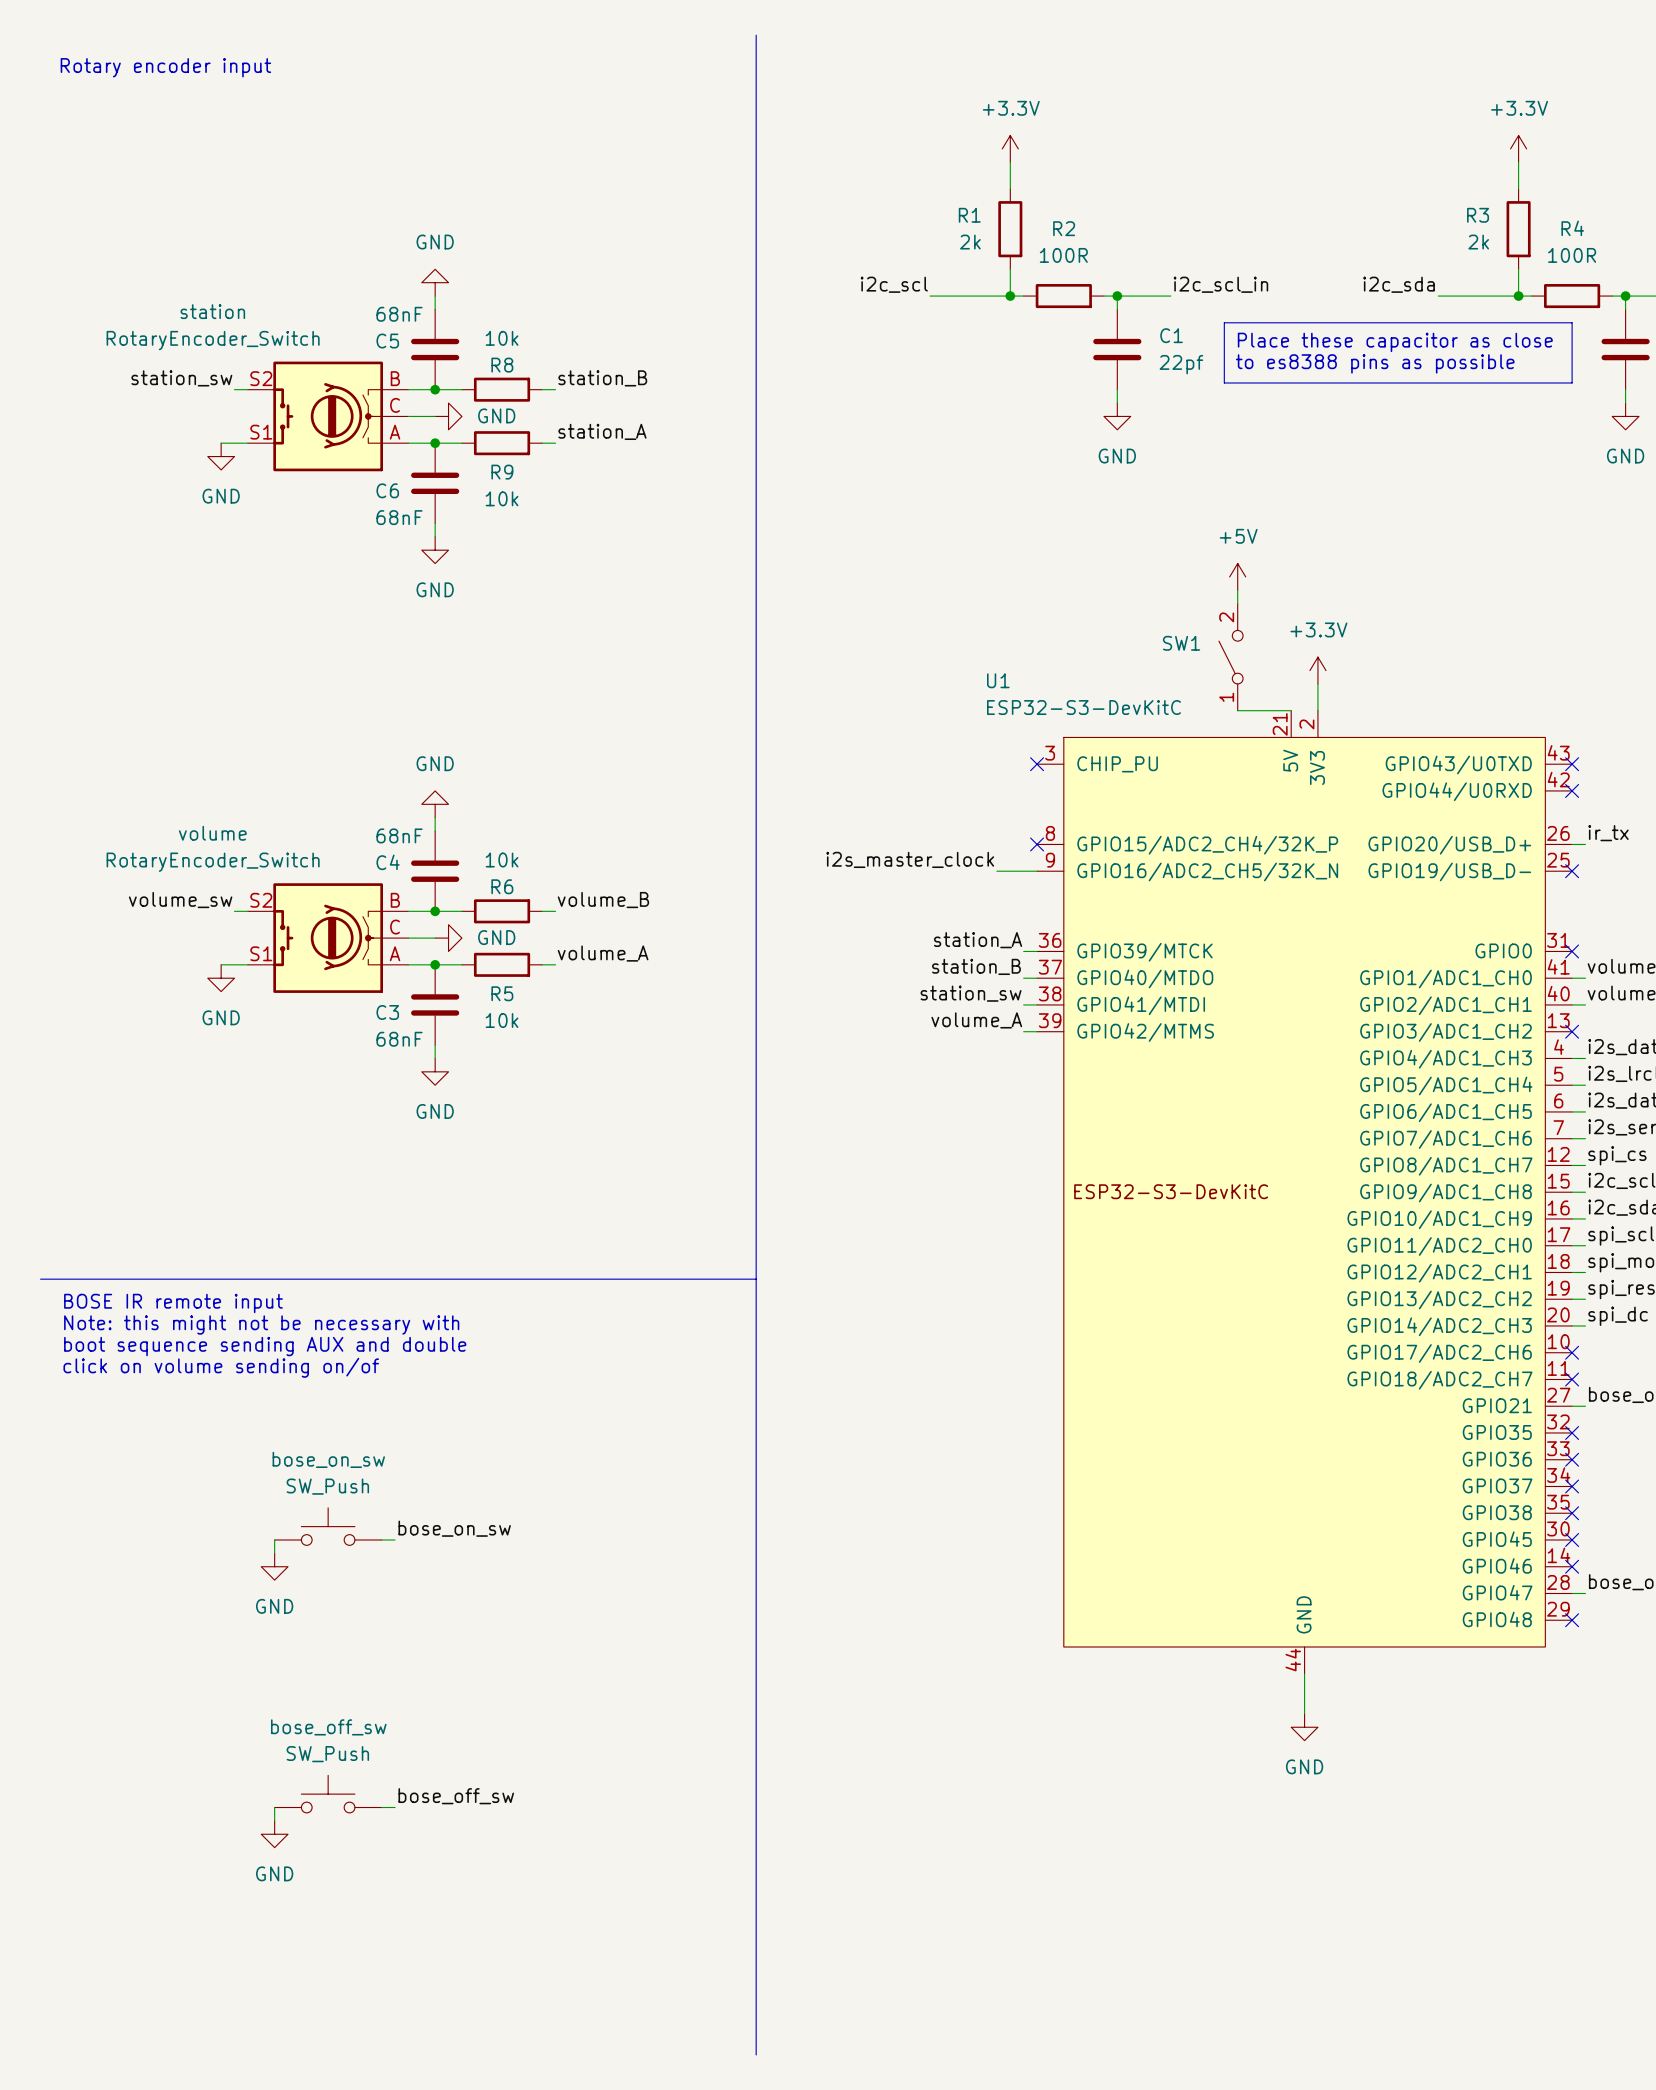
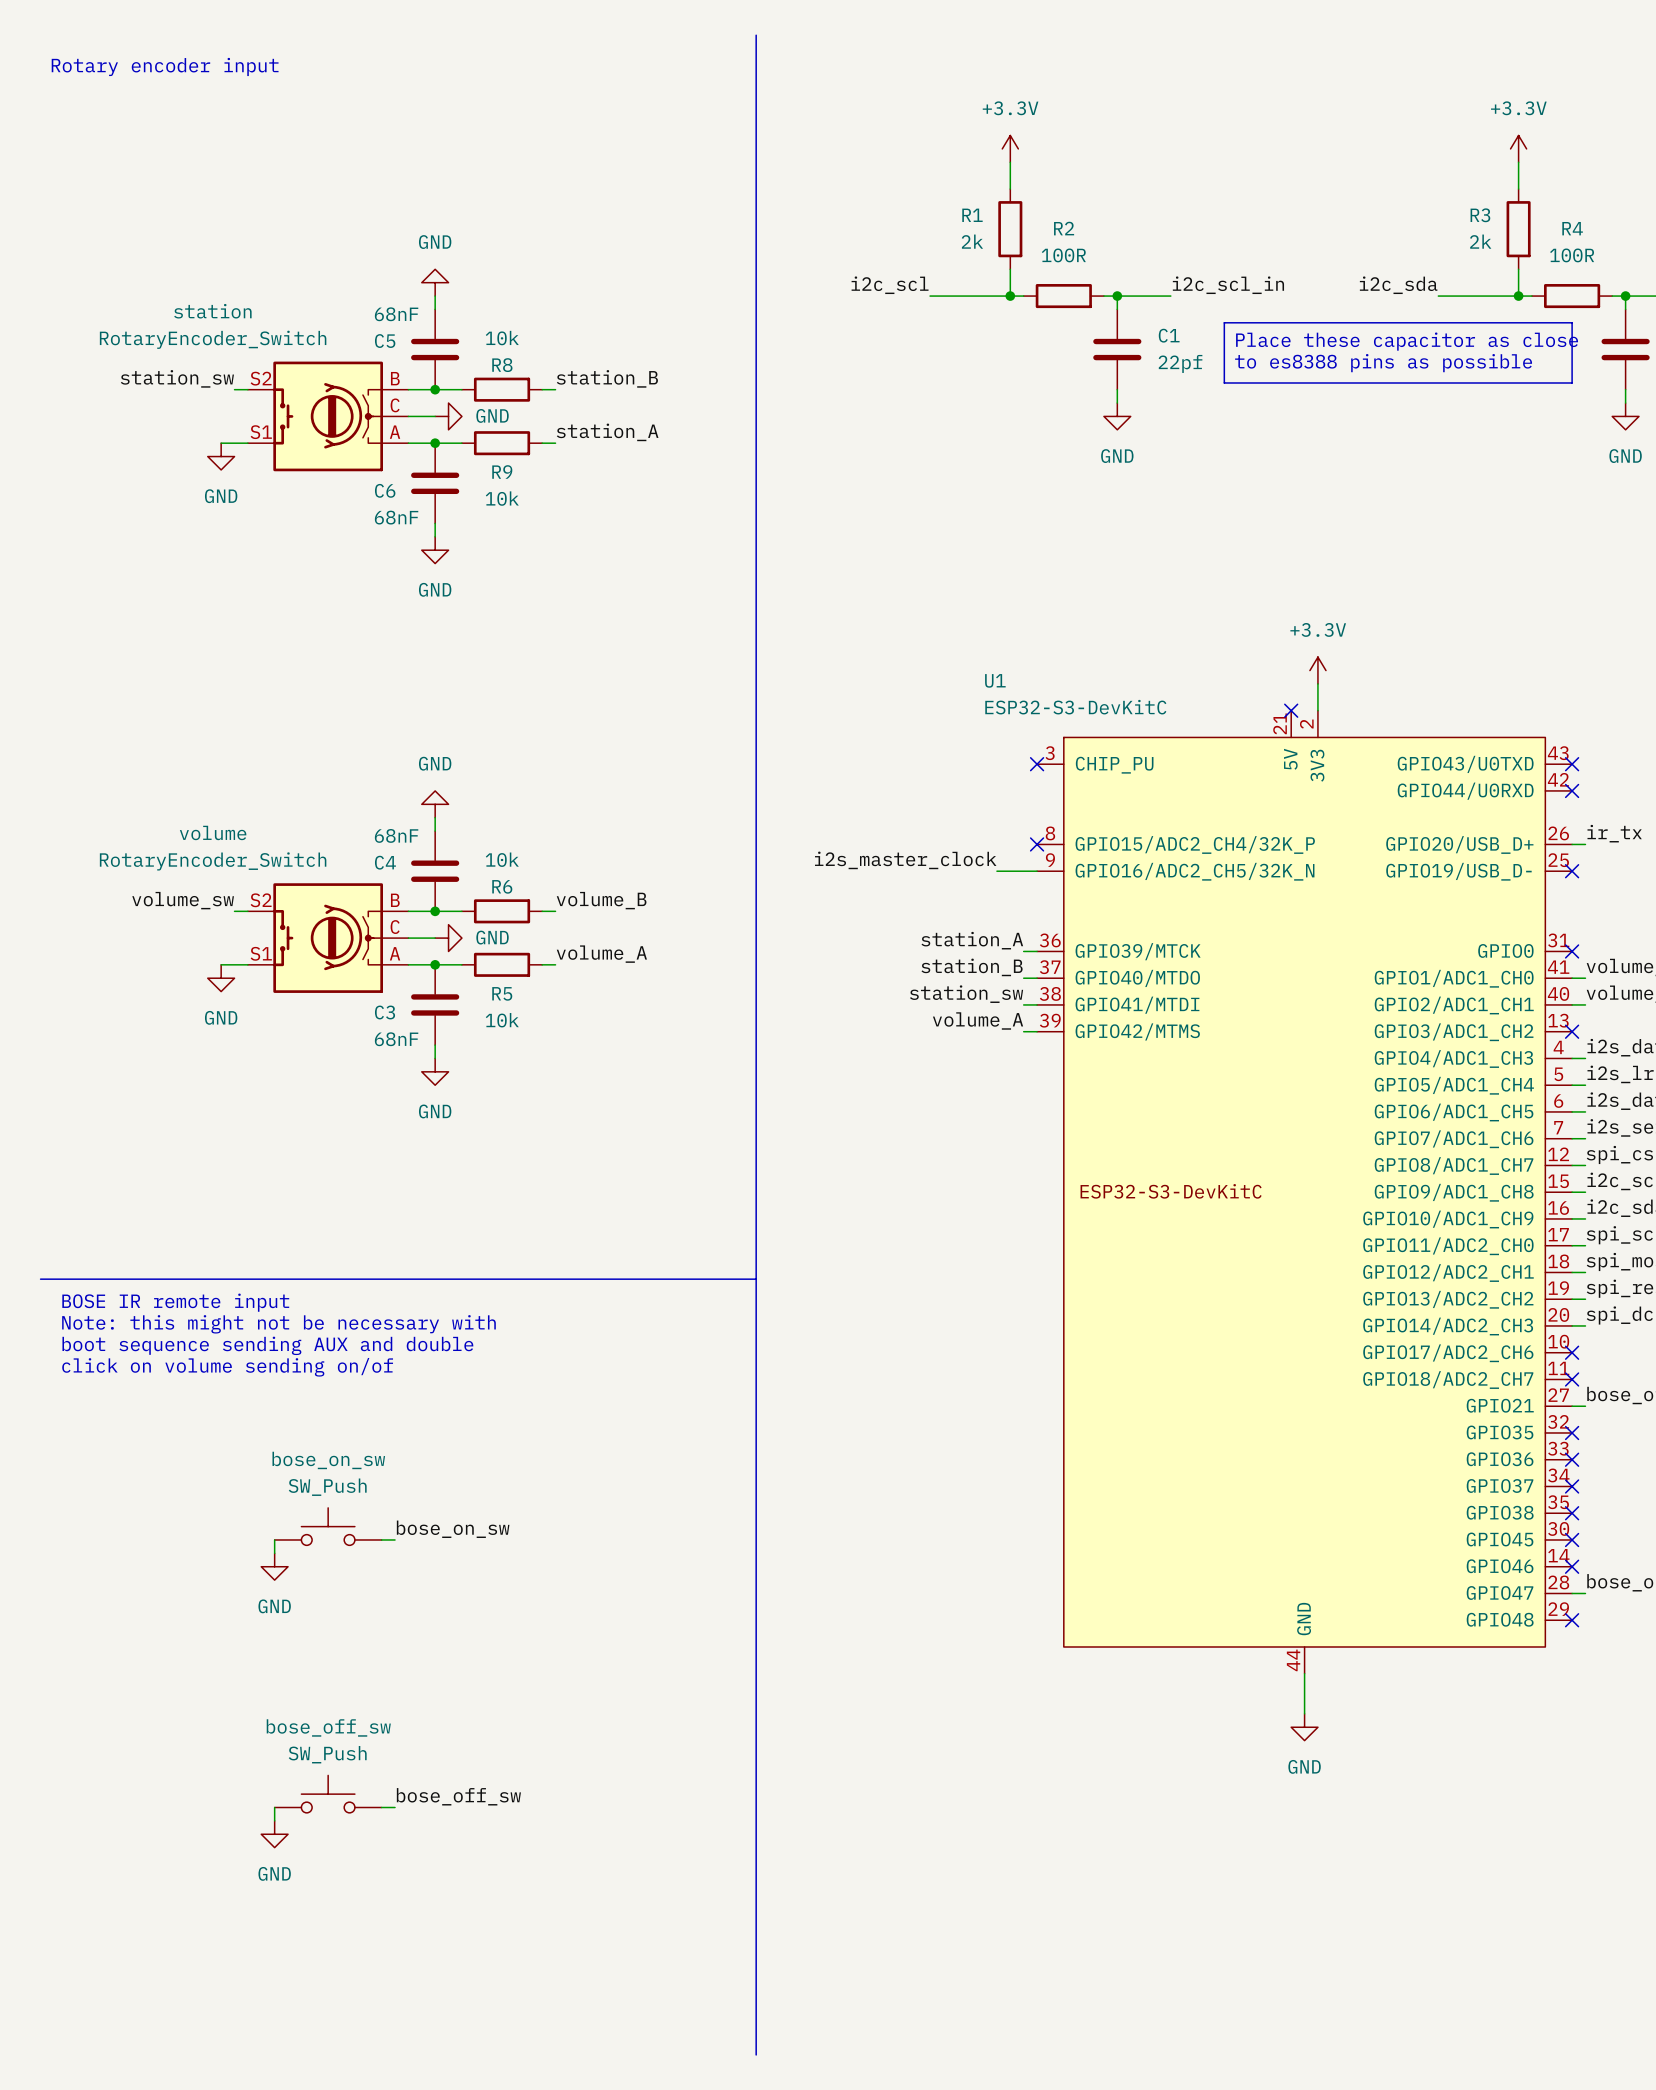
power symbol: +5V (1237, 576) -> none
wire: (1237, 590) (1237, 603) -> none
SW1: (1231, 657) -> none
wire: (1237, 710) (1291, 710) -> none
no-connect mark: none -> (1291, 710)

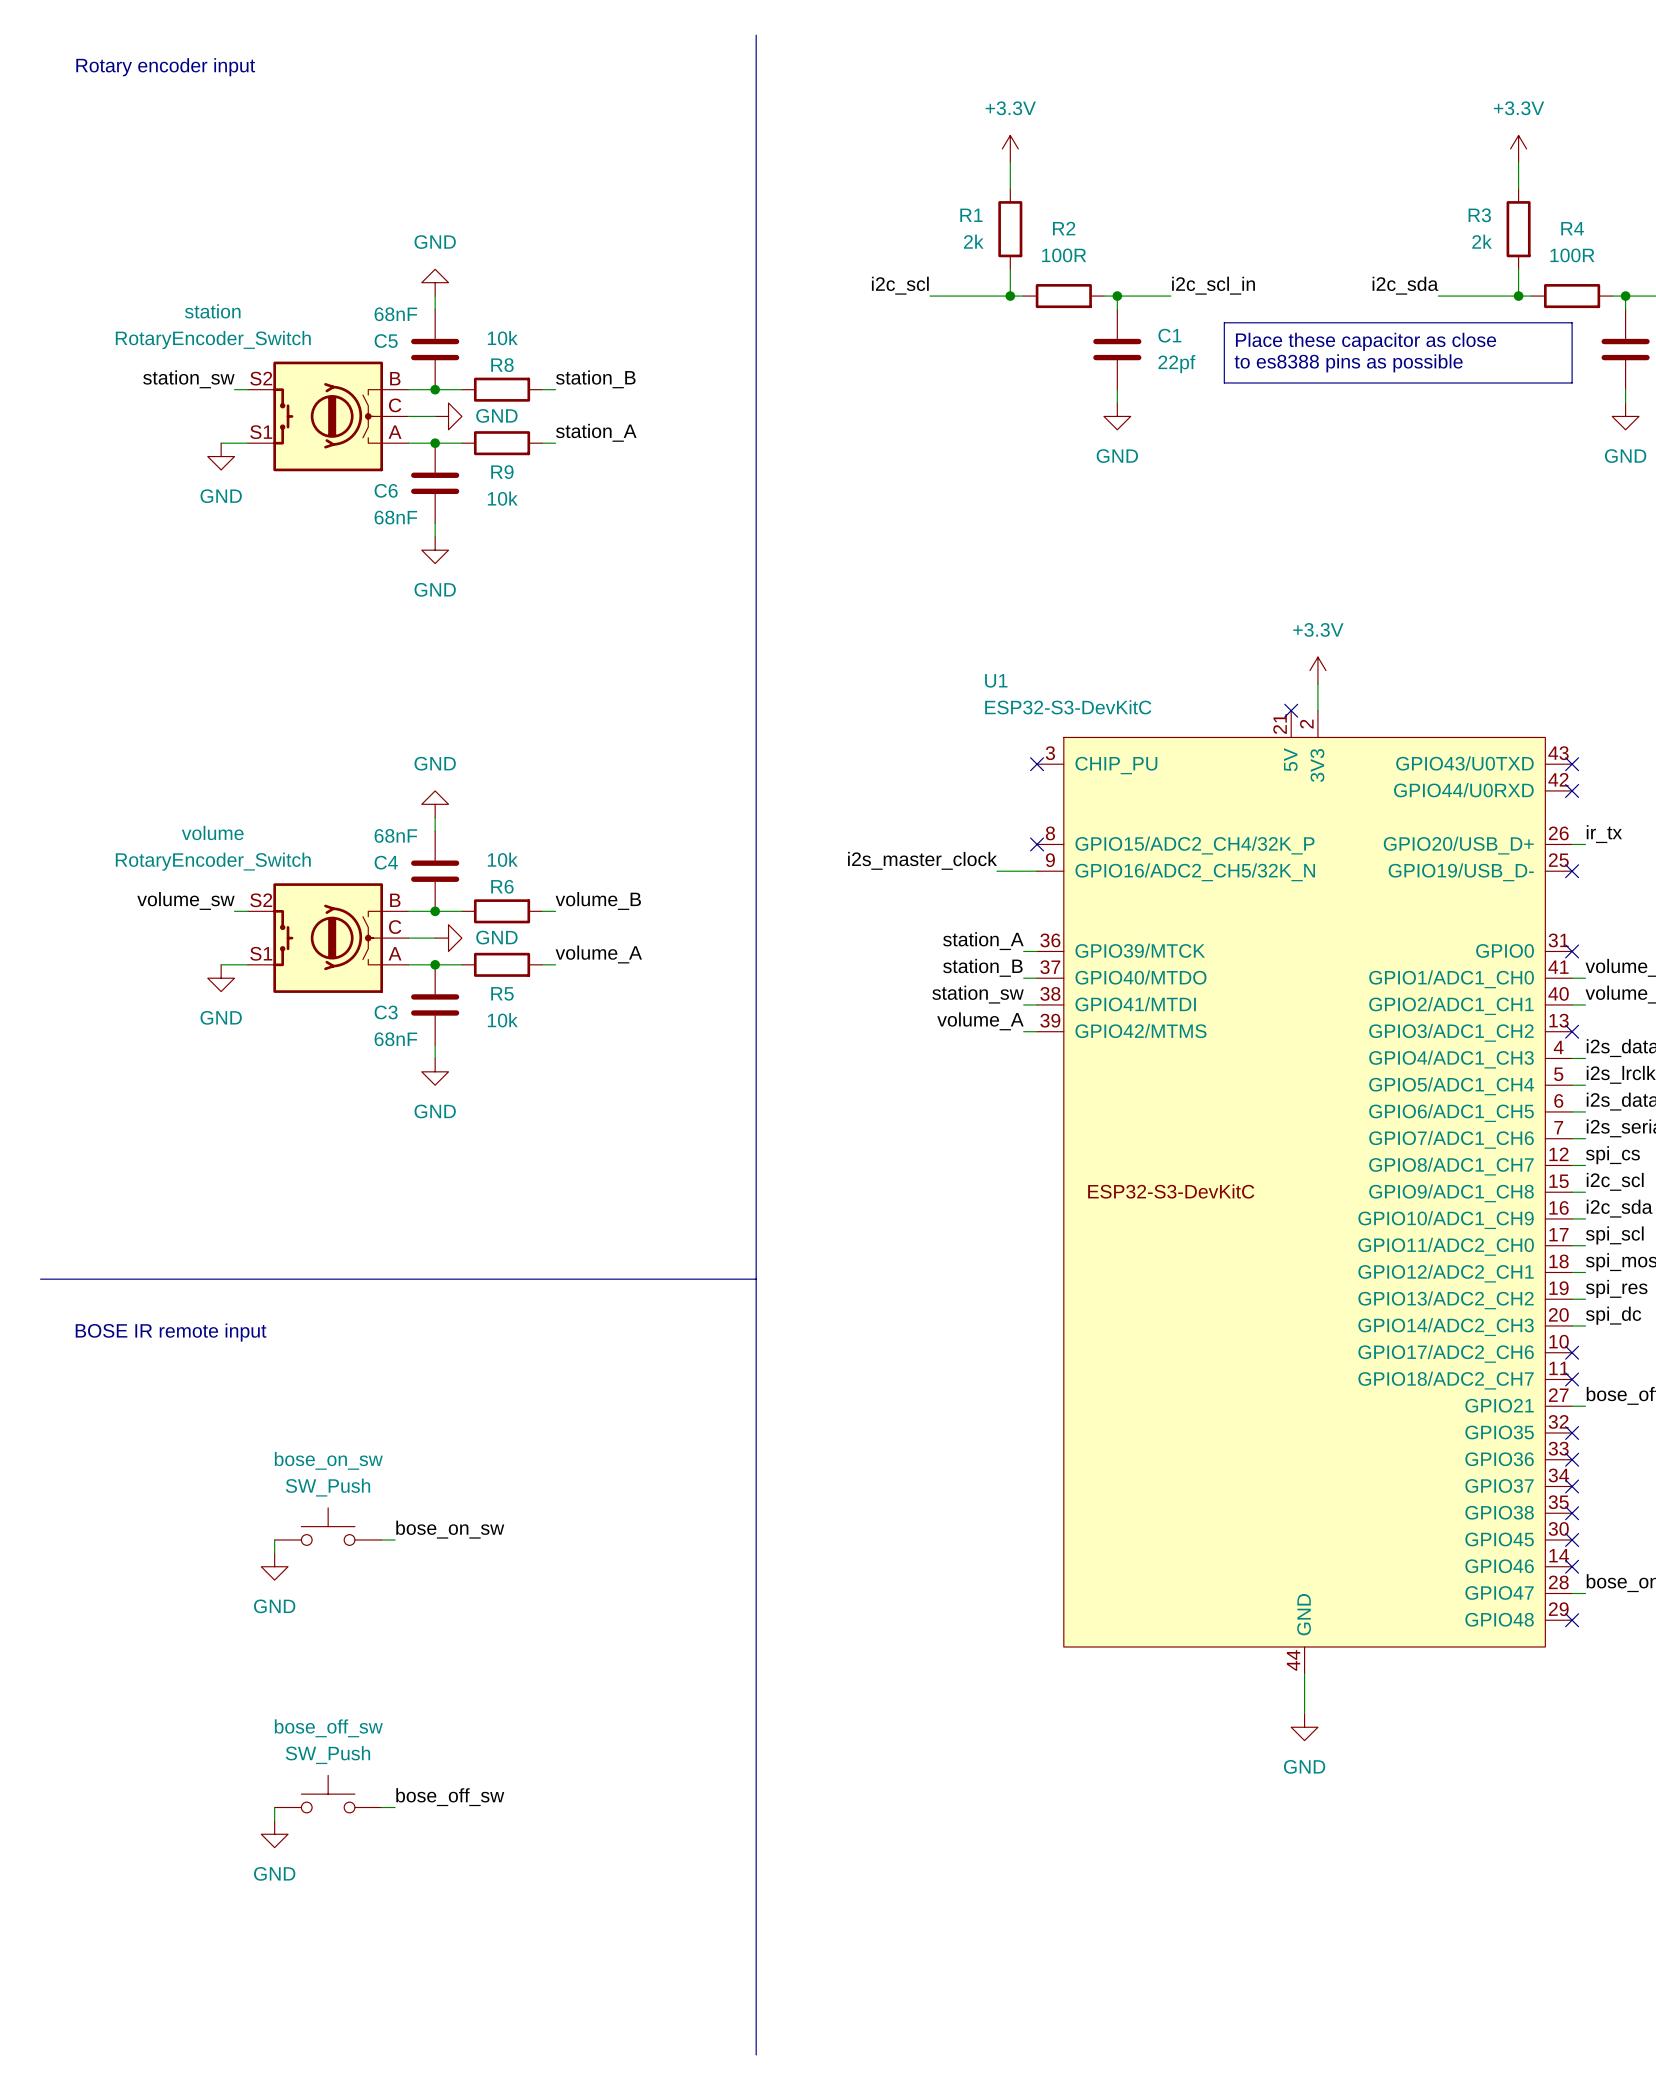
text position: BOSE IR remote input (175, 1302) -> BOSE IR remote input (171, 1332)
text: Note: this might not be necessary with (278, 1324) -> none
text: boot sequence sending AUX and double (267, 1345) -> none
text: click on volume sending on/of (227, 1367) -> none

